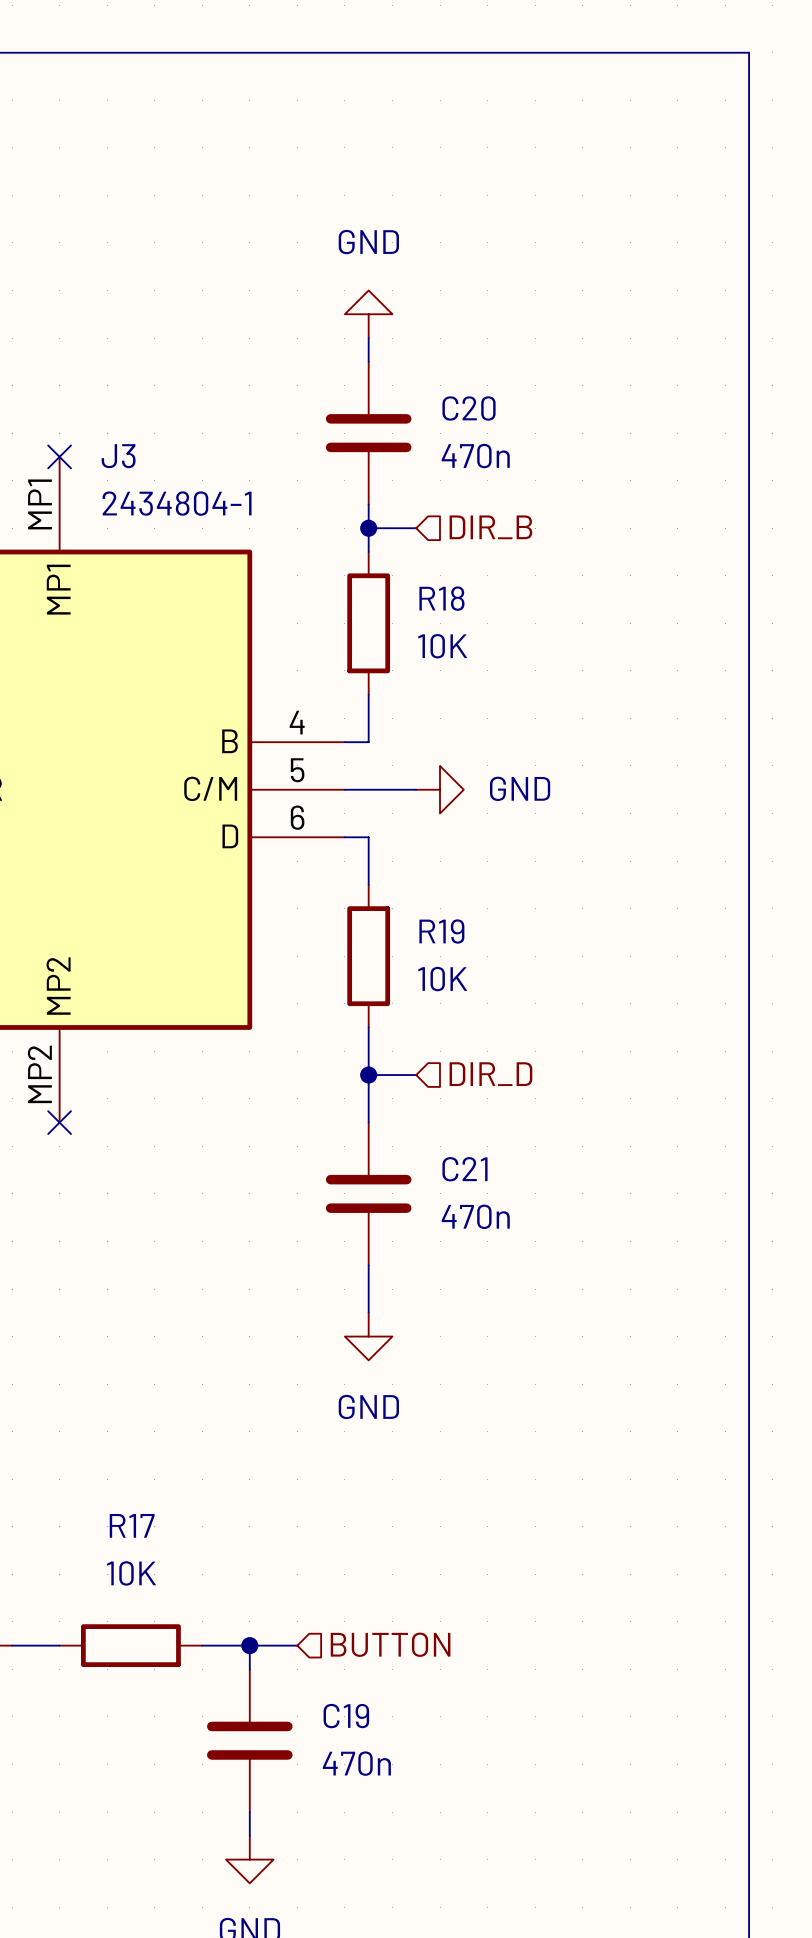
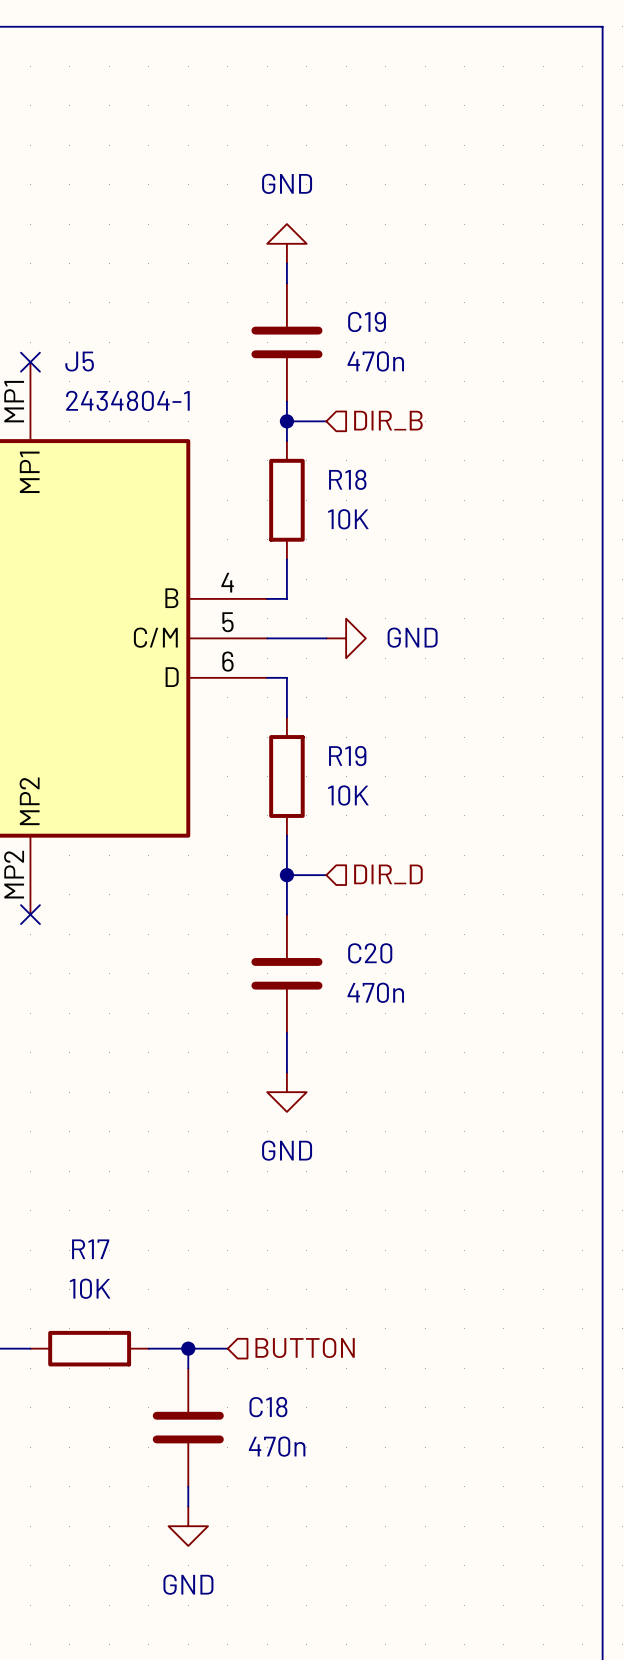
C20 name: C20 (469, 408) -> C19 (367, 321)
J3 name: J3 (118, 456) -> J5 (79, 361)
C21 name: C21 (464, 1169) -> C20 (370, 953)
C19 name: C19 (346, 1716) -> C18 (268, 1407)

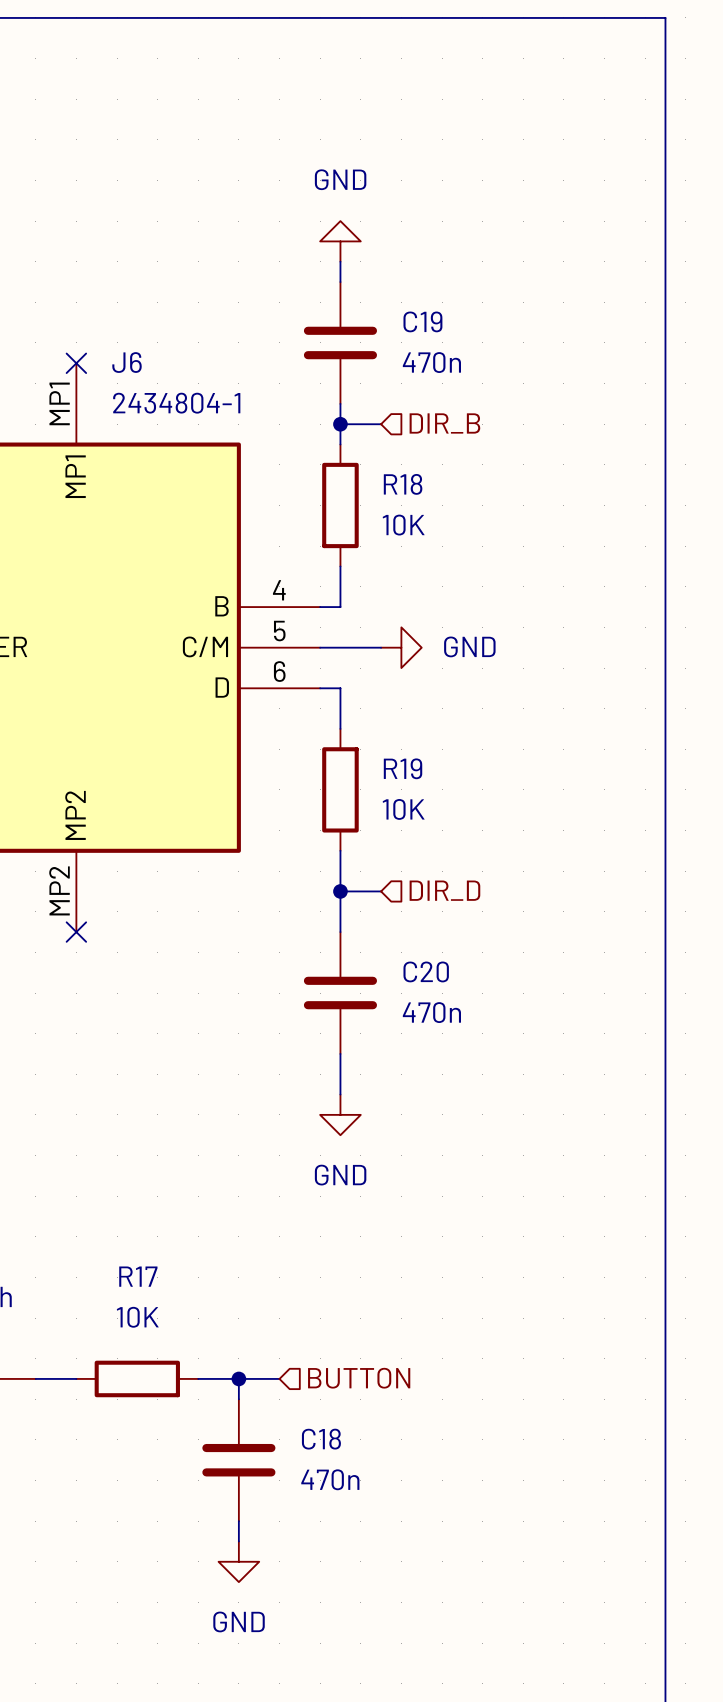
J5 name: J5 (79, 361) -> J6 (127, 362)

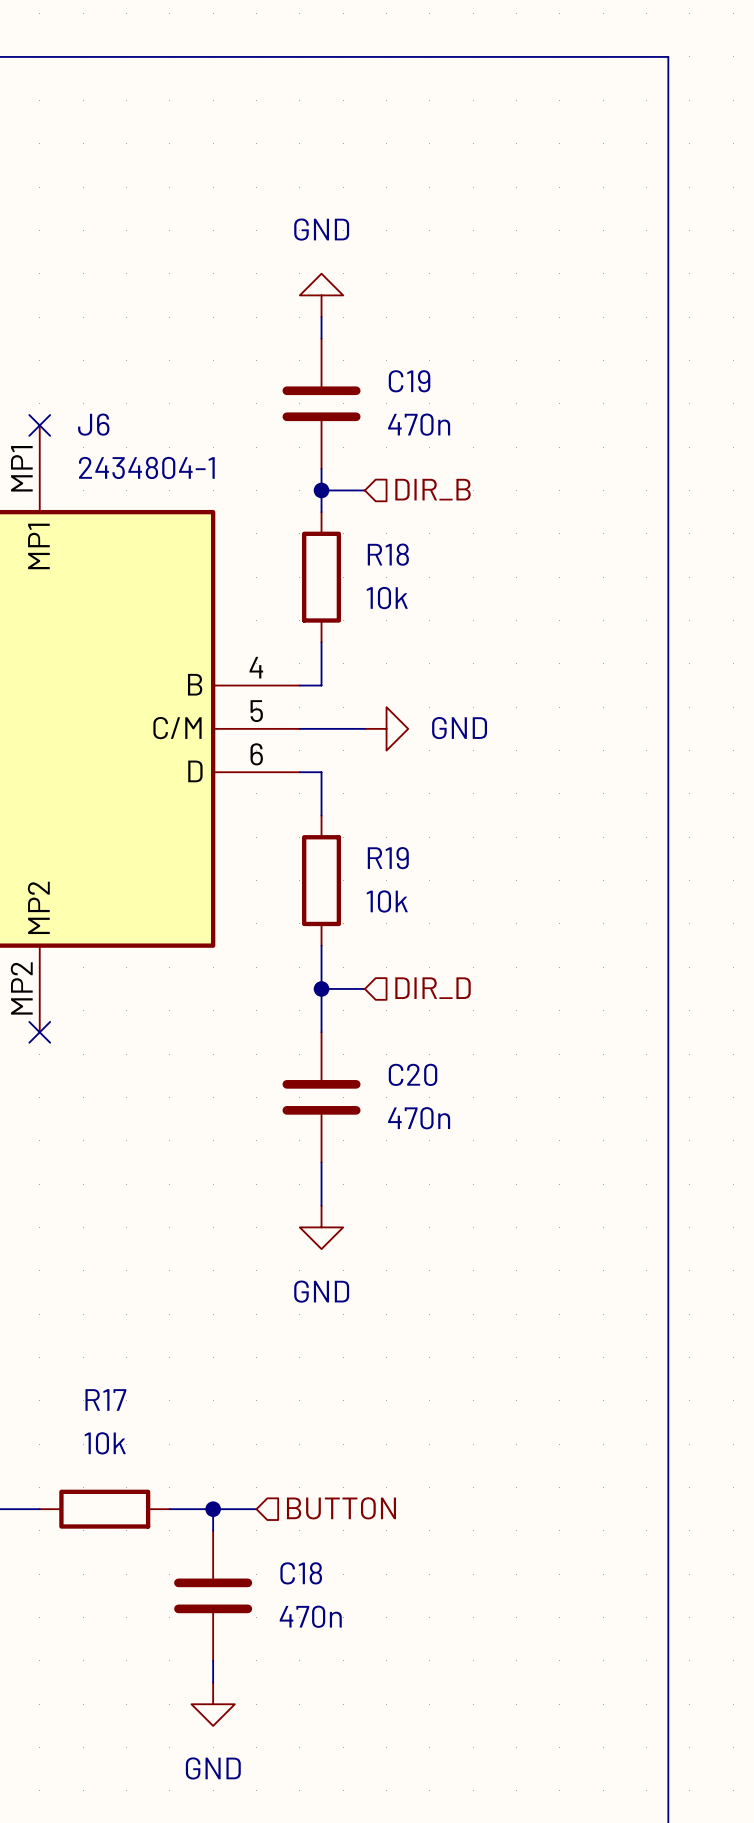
R18 value: 10K (403, 525) -> 10k (387, 598)
R19 value: 10K (403, 809) -> 10k (387, 901)
R17 value: 10K (137, 1317) -> 10k (105, 1443)

